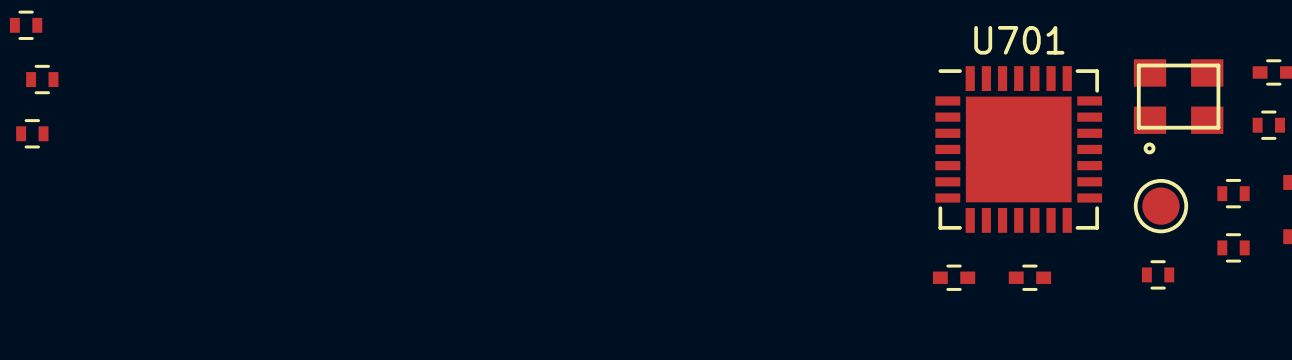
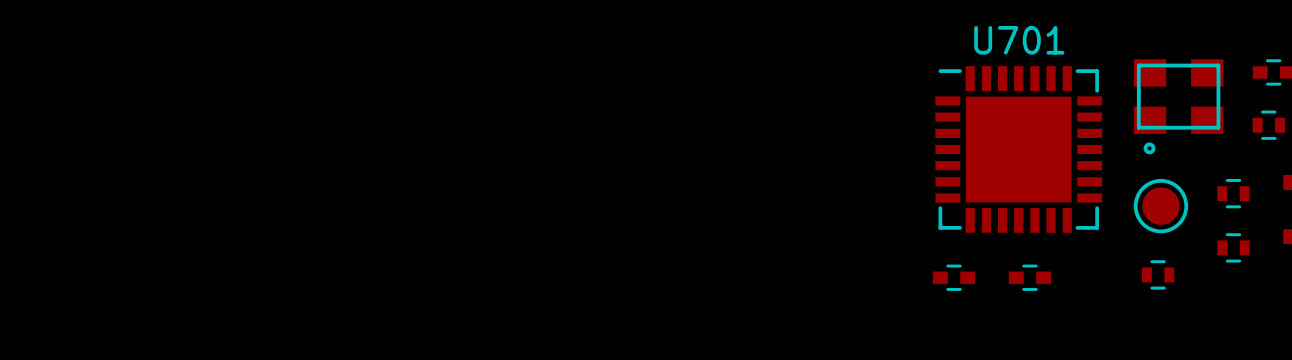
part: (26, 25) -> none
part: (42, 79) -> none
part: (32, 133) -> none

